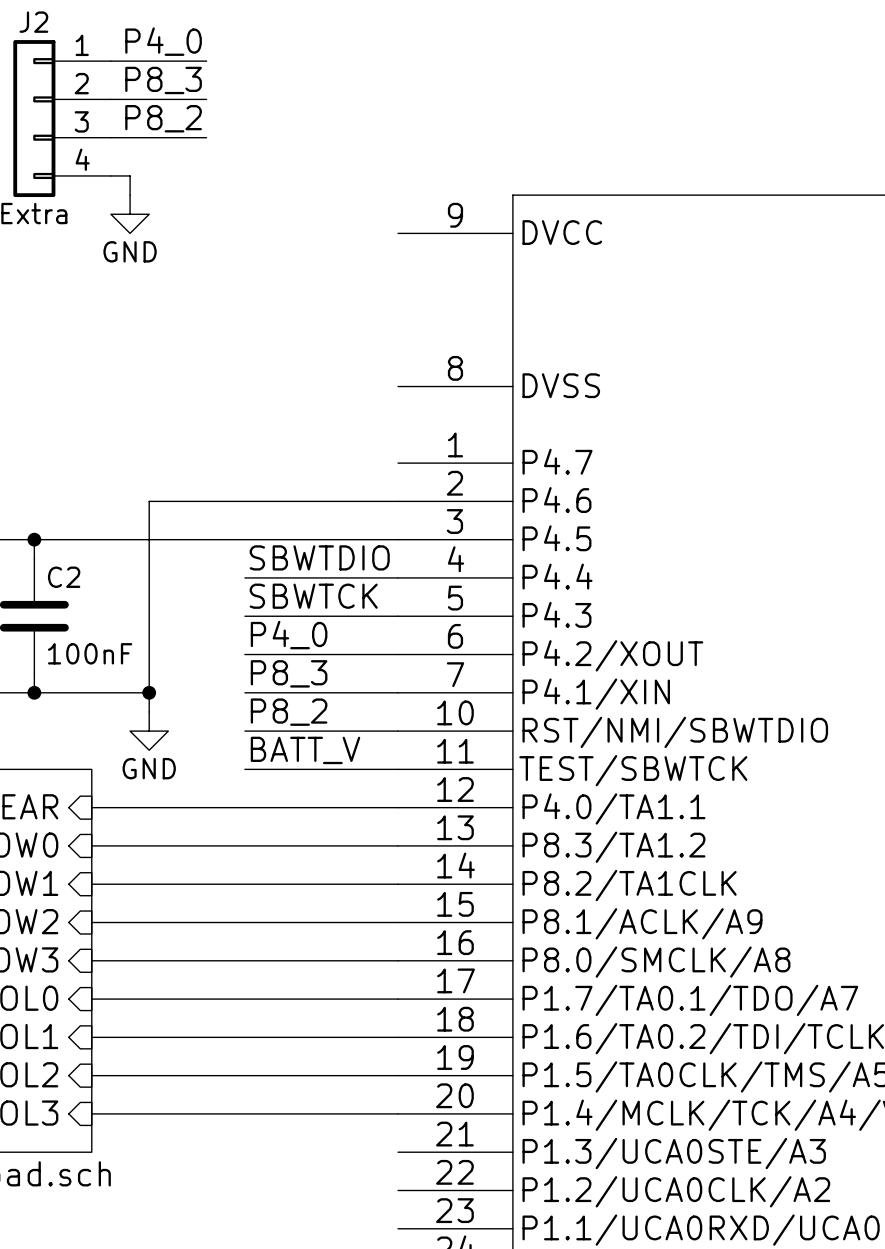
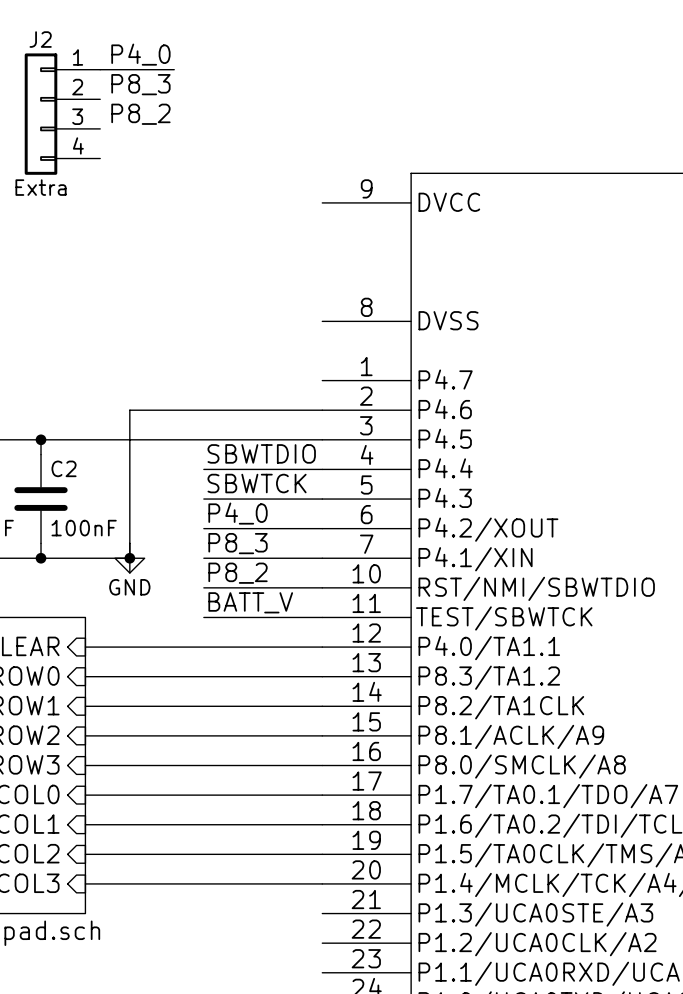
wire: (110, 99) (206, 99) -> none
wire: (110, 137) (206, 137) -> none
wire: (110, 175) (130, 175) (130, 195) -> none
power symbol: GND (130, 214) -> none
power symbol position: GND (149, 731) -> GND (129, 558)

